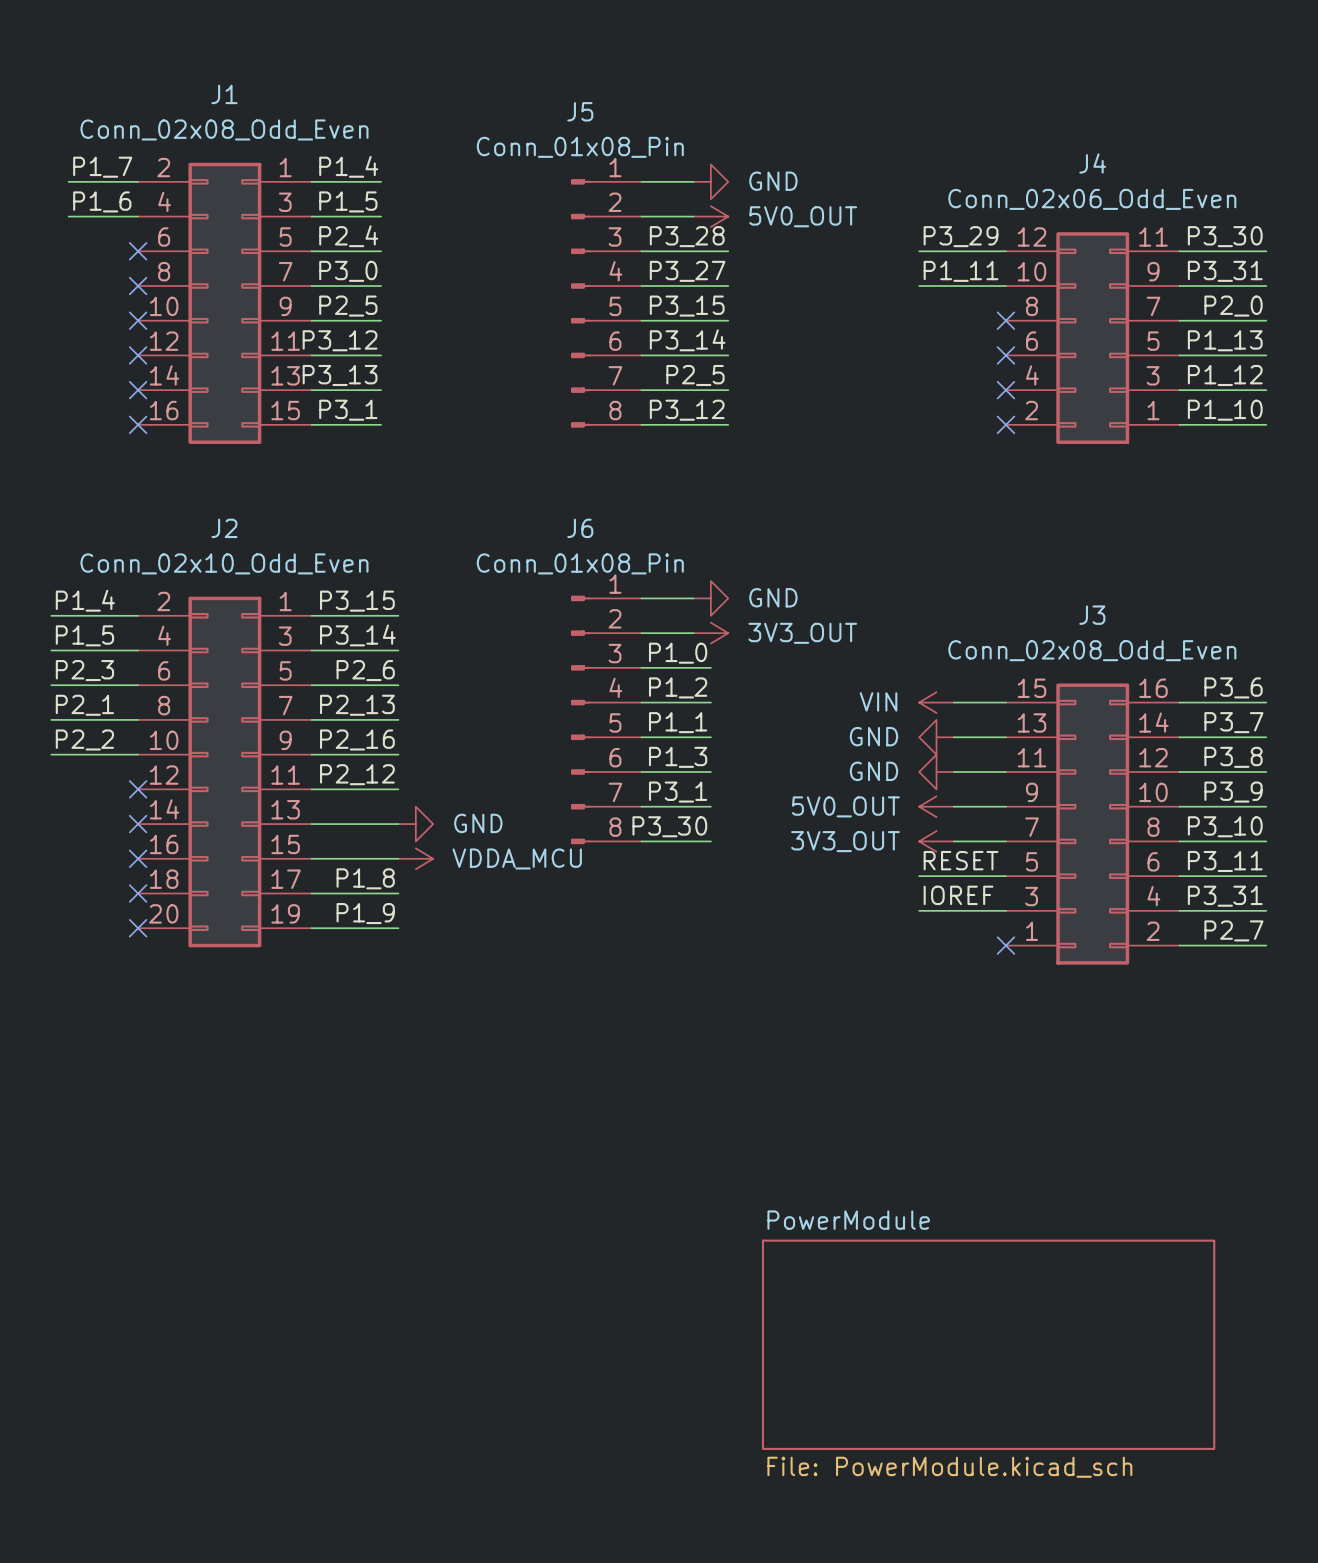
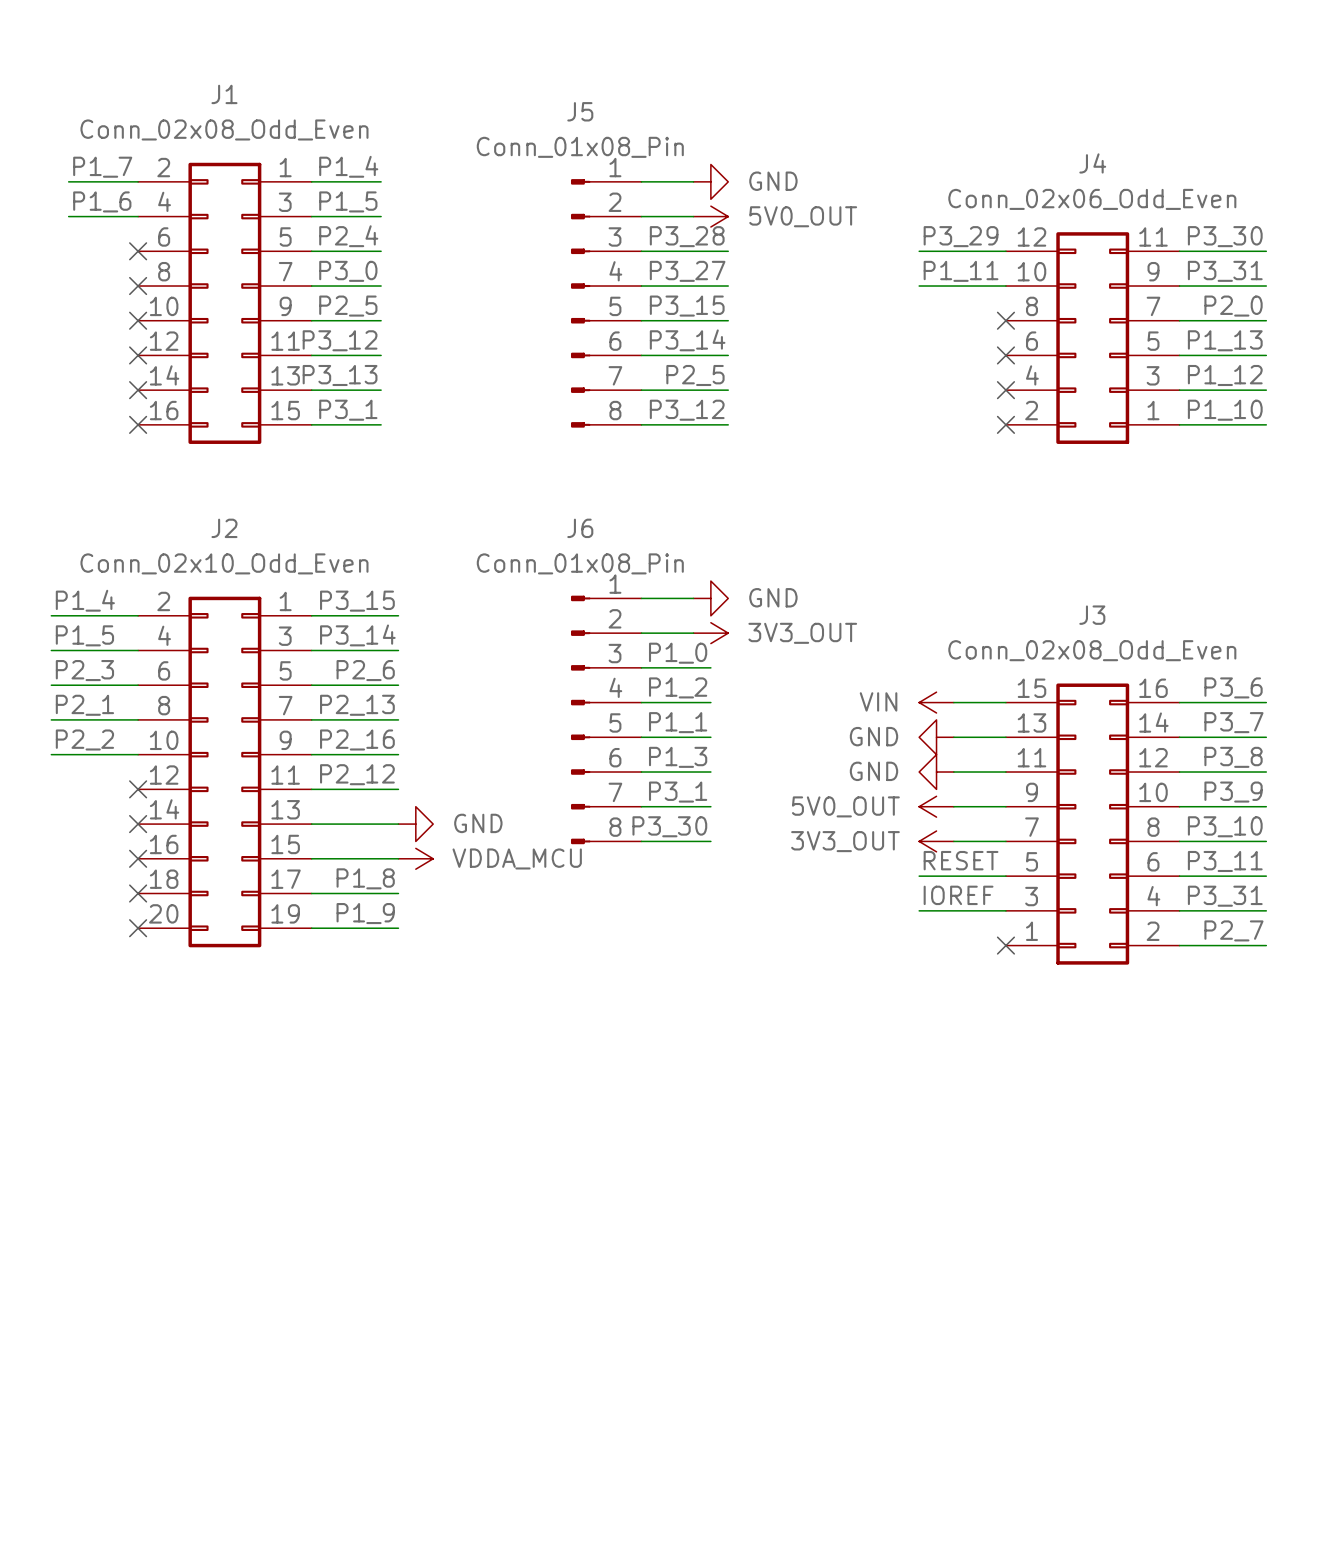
sheet PowerModule: File: PowerModule.kicad_sch (988, 1344) -> none

